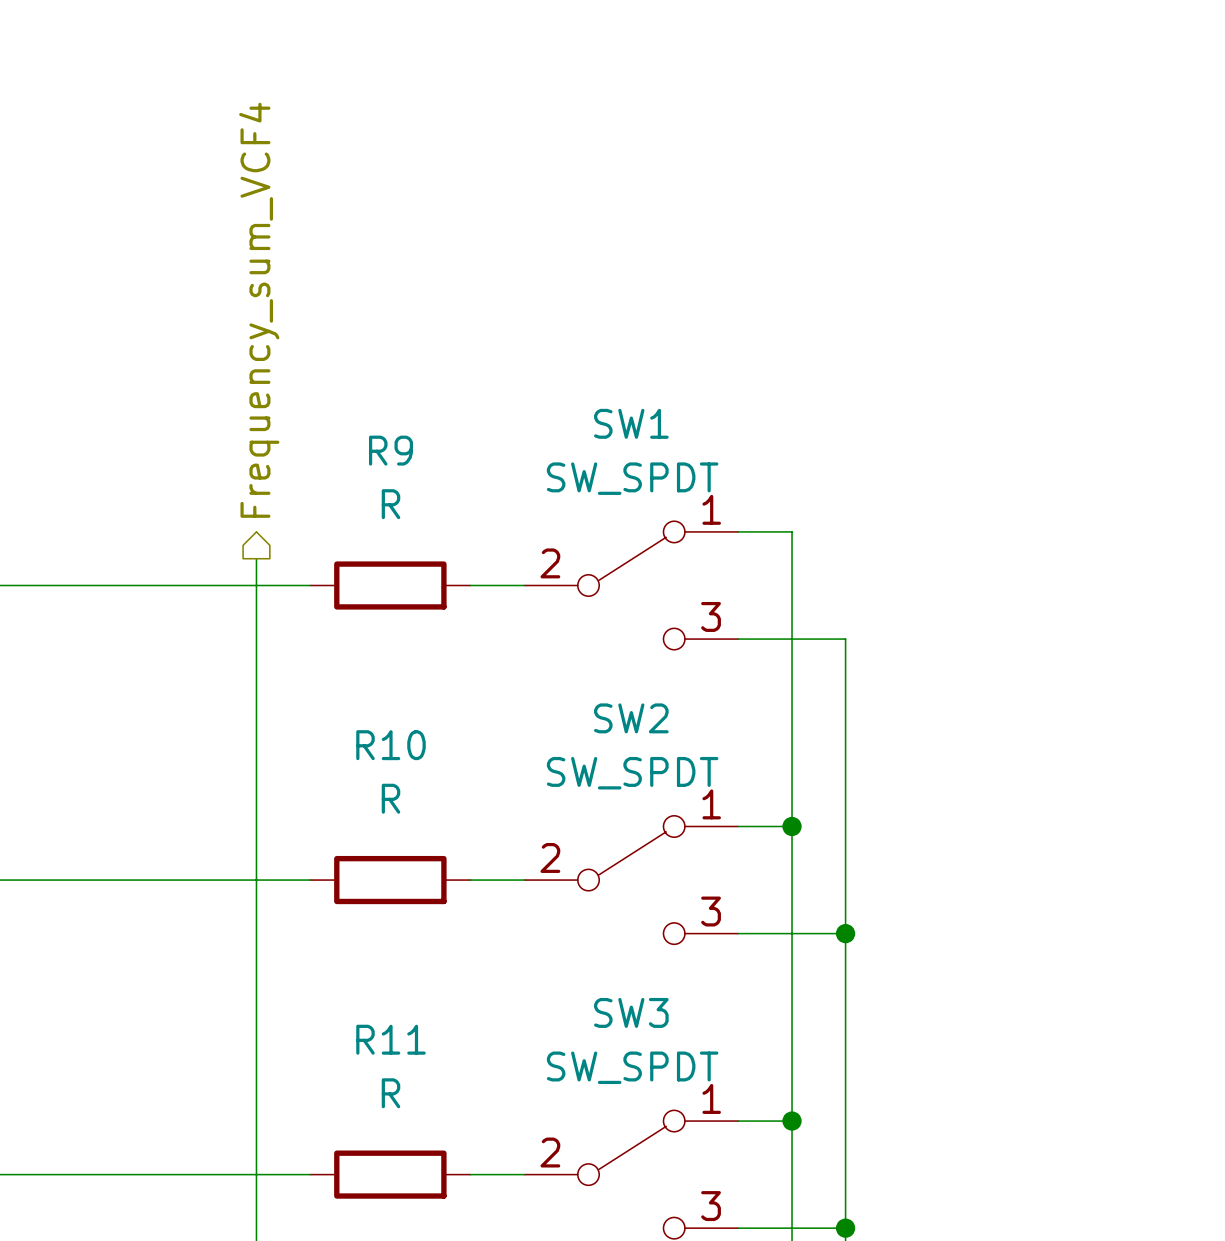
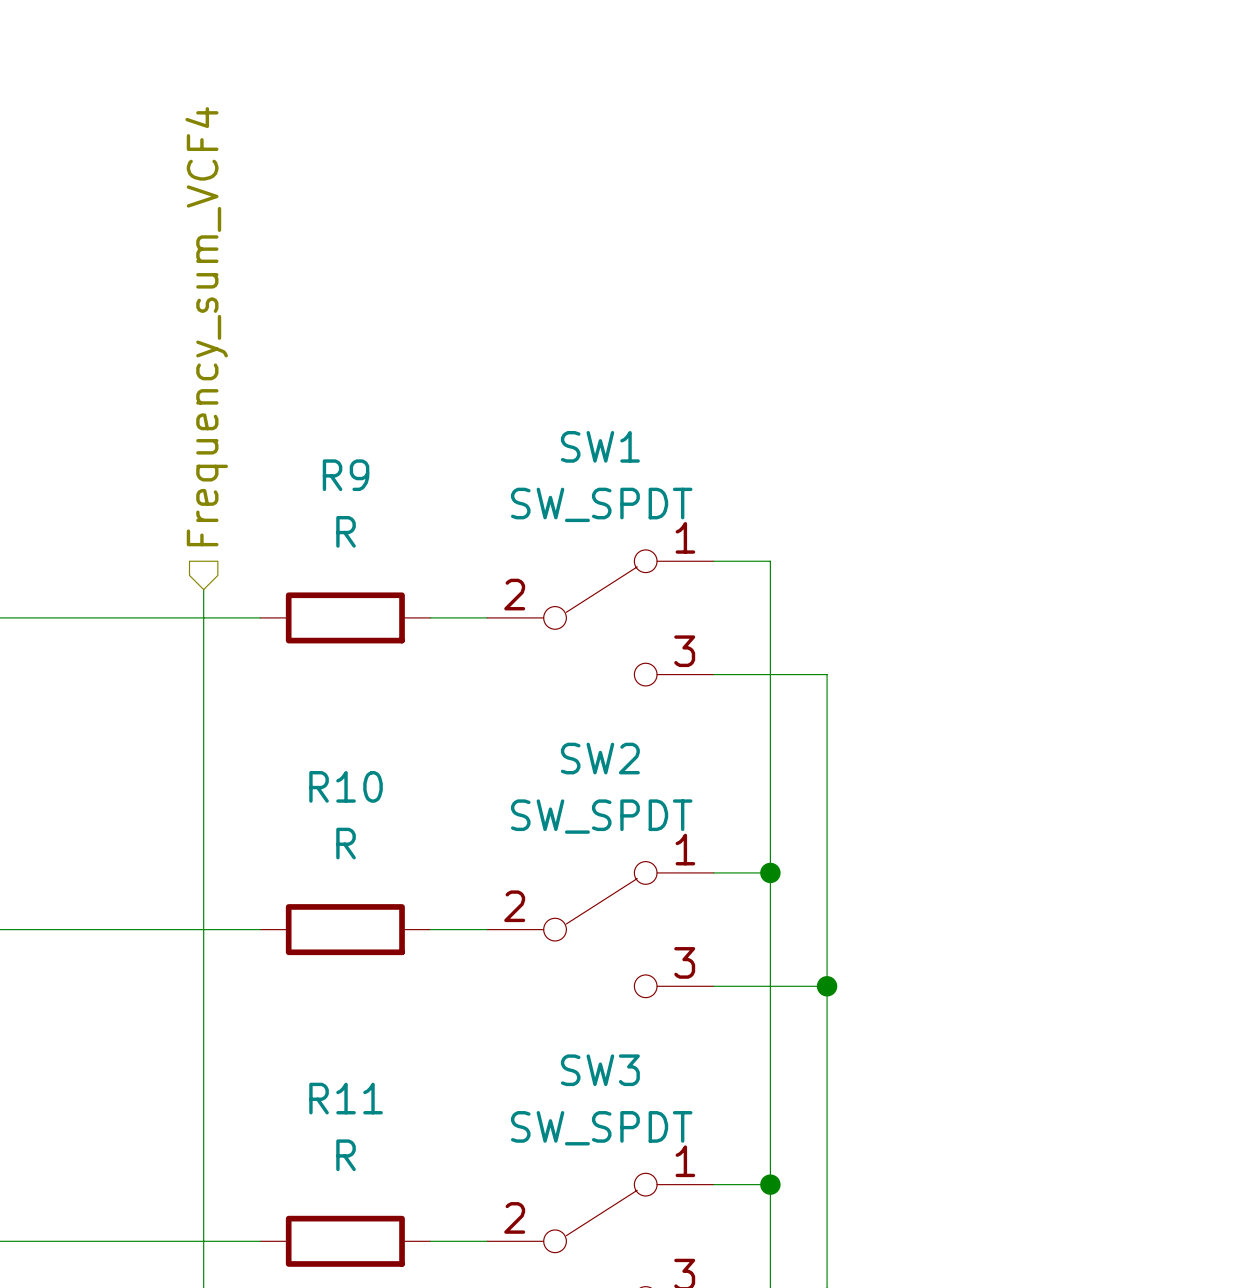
hierarchical label shape: output (259, 310) -> input (206, 326)

